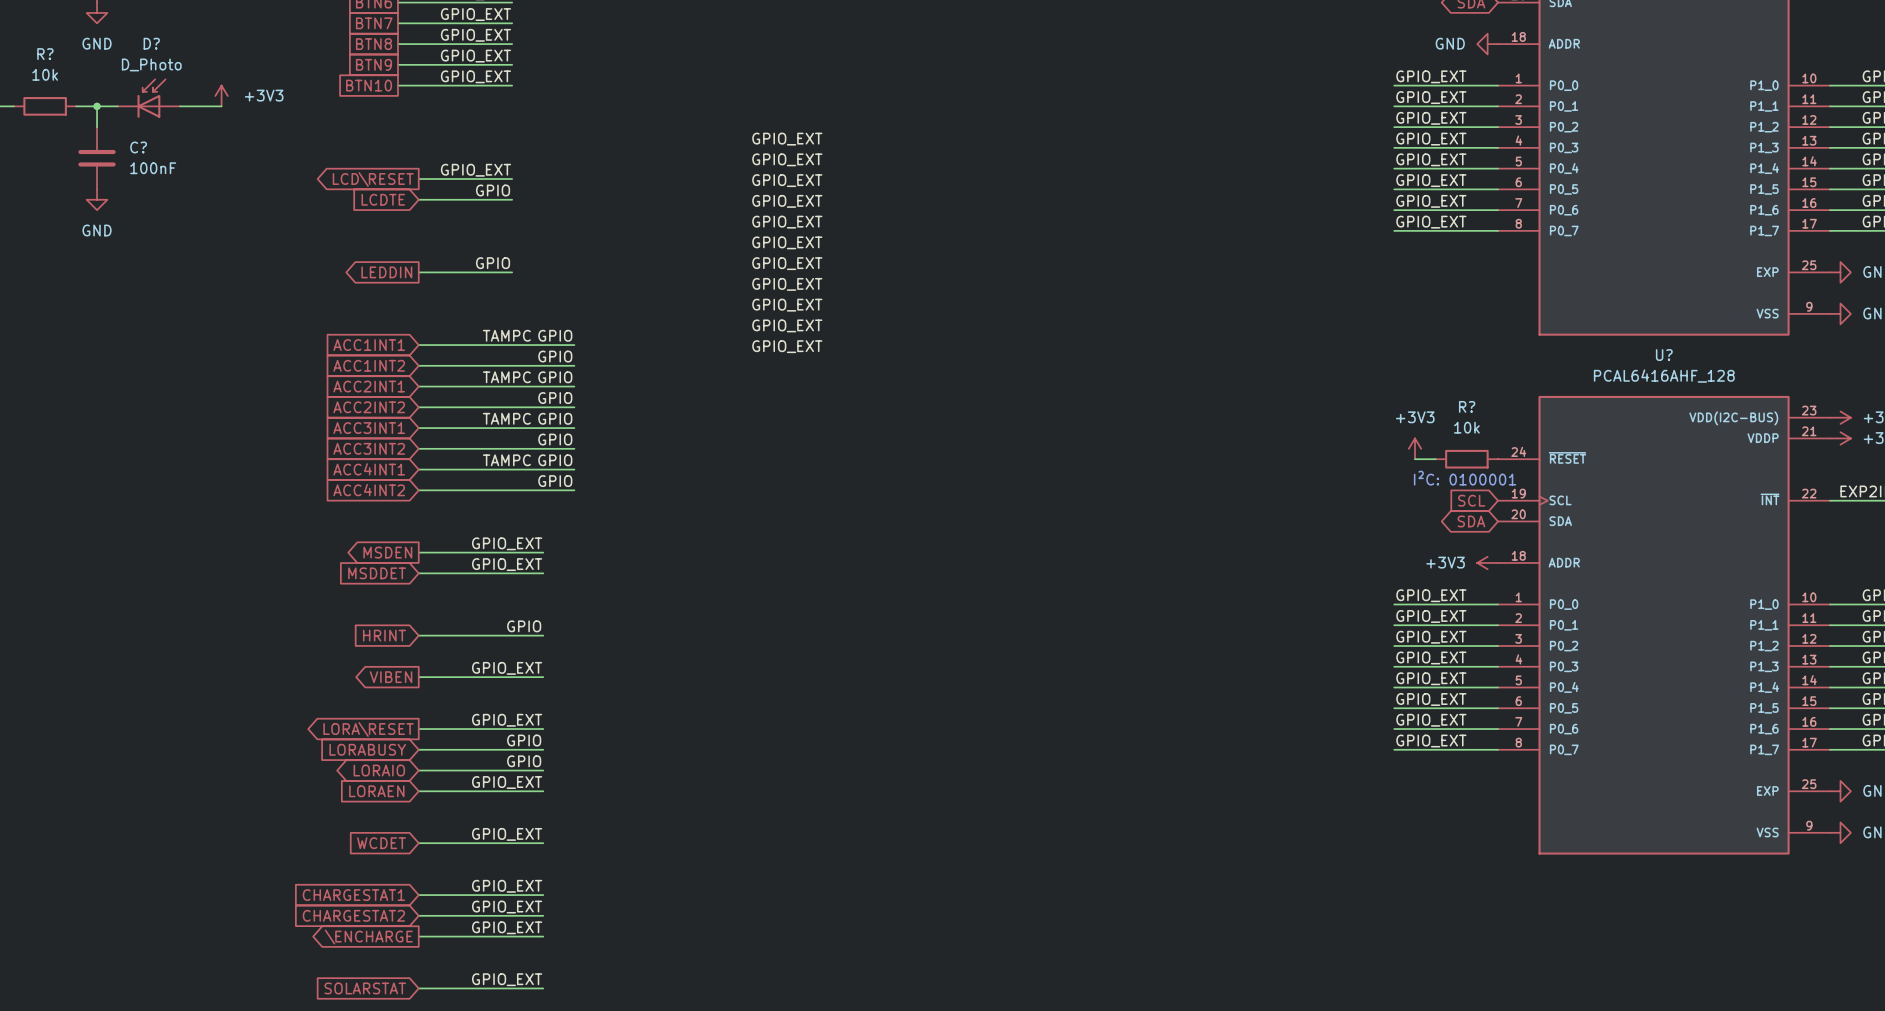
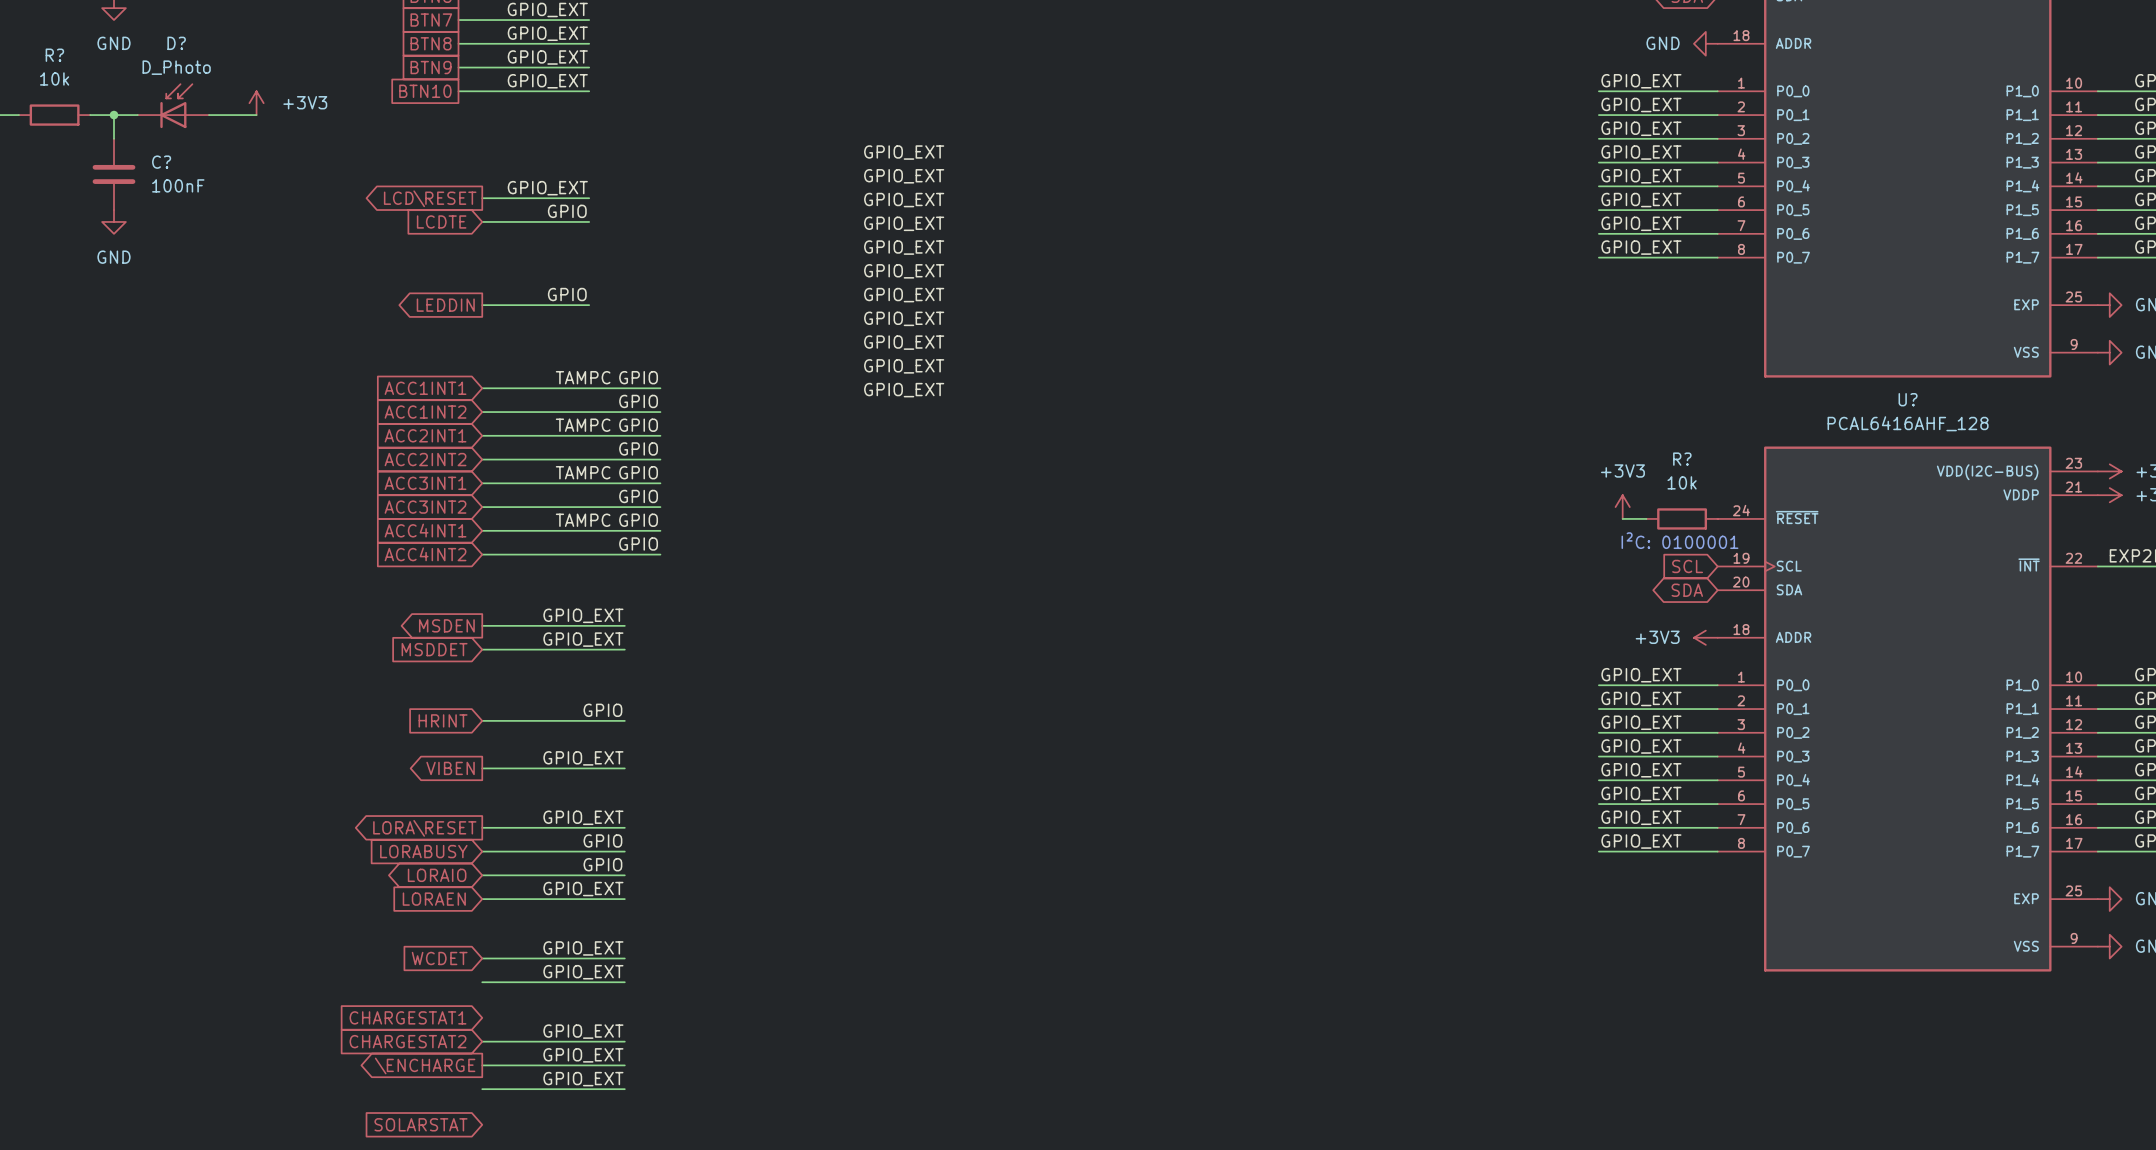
label: none -> GPIO_EXT (583, 972)
label: GPIO_EXT (507, 886) -> none
wire: (418, 895) (543, 895) -> (482, 982) (624, 982)
label: none -> GPIO_EXT (583, 1079)
label: GPIO_EXT (507, 979) -> none
wire: (418, 988) (543, 988) -> (482, 1089) (624, 1089)

